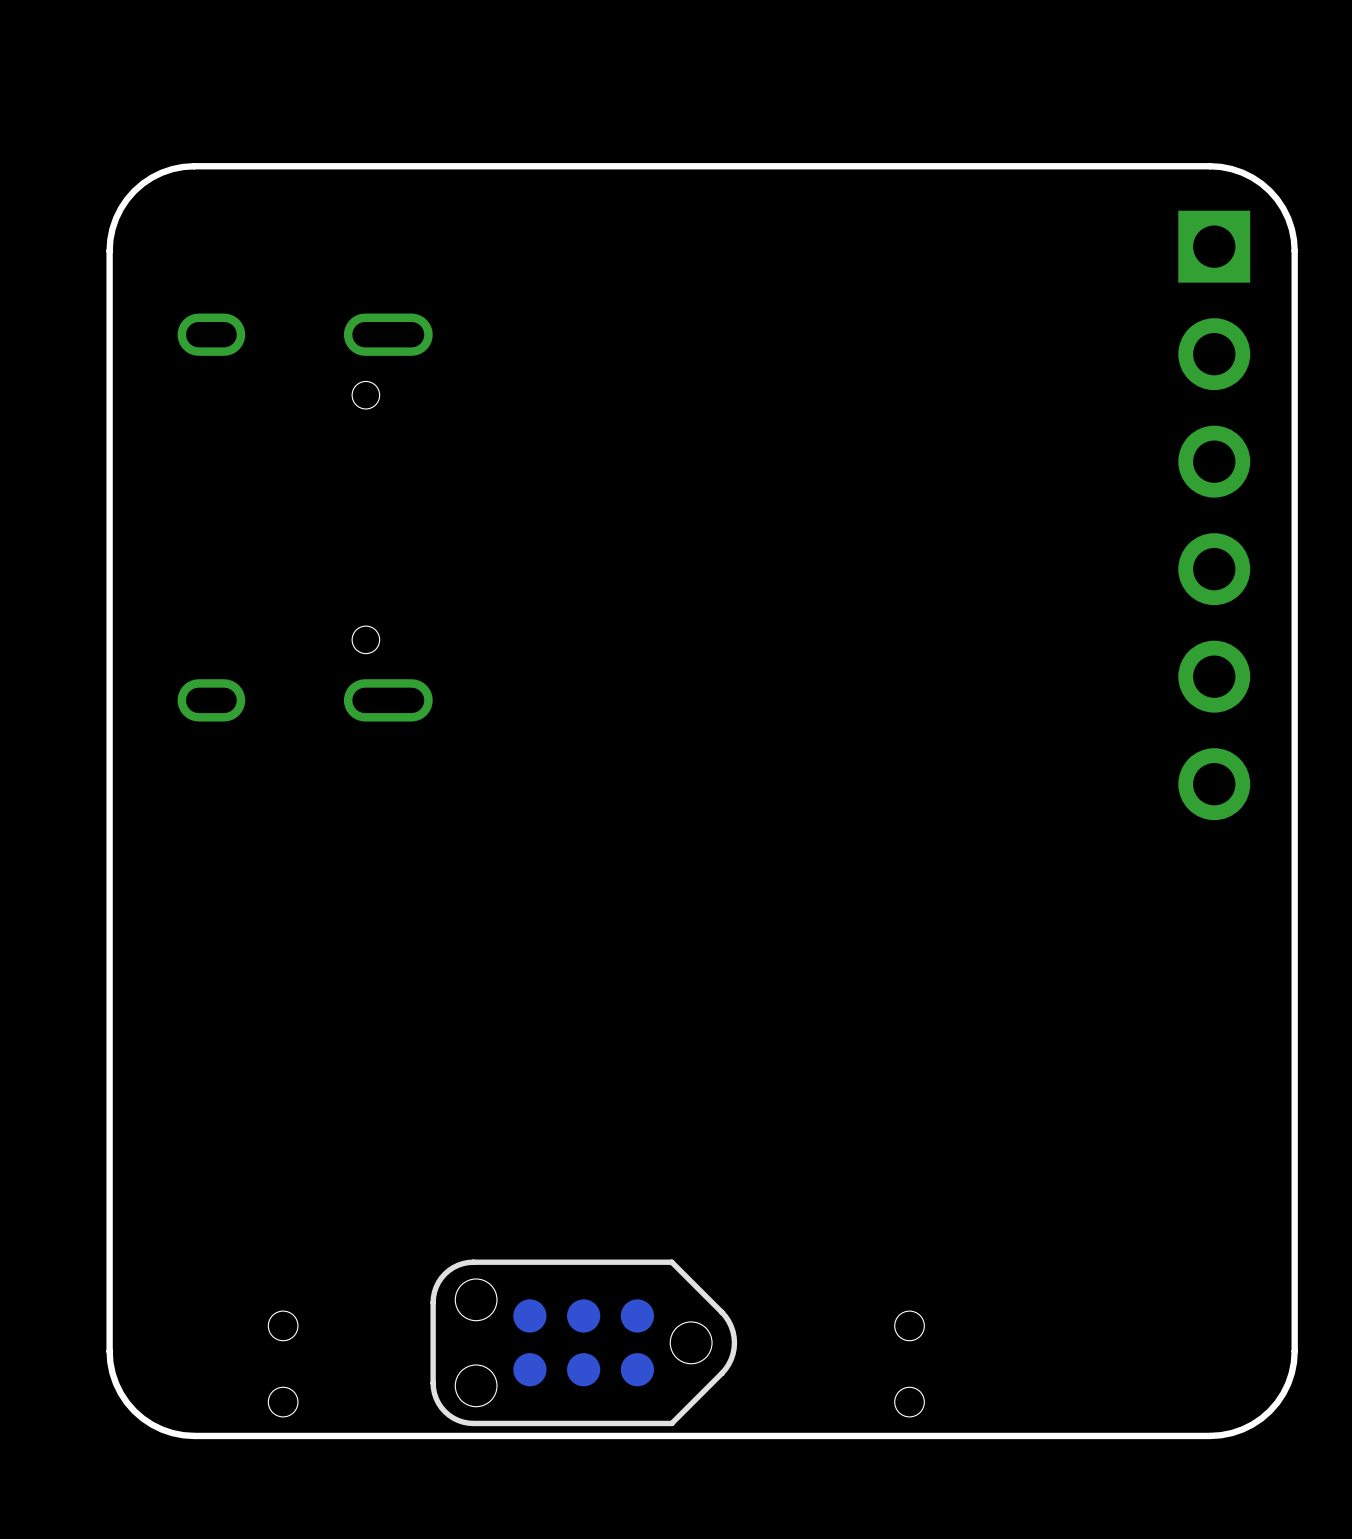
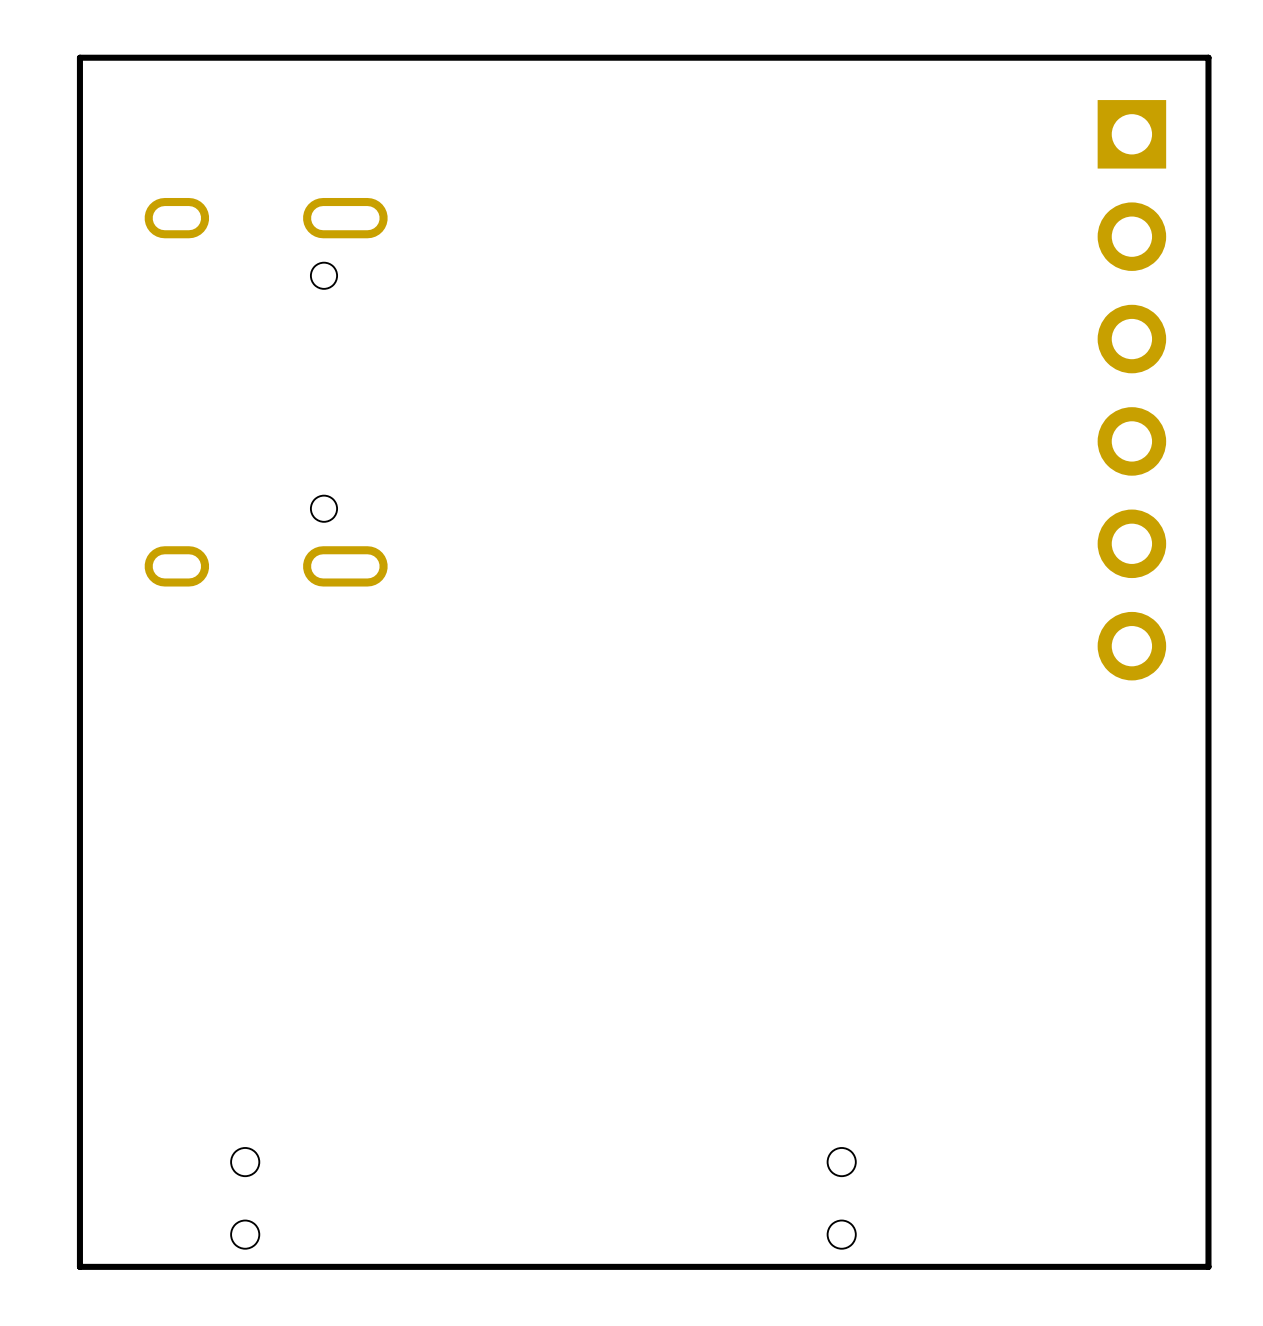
board edge: (194, 166) (161, 172) (134, 191) (116, 218) (109, 250) -> (160, 57) (79, 57) (79, 138)
board edge: (1210, 166) (1242, 172) (1269, 191) (1288, 218) (1294, 250) -> (1127, 57) (1208, 57) (1208, 138)
part: (583, 1342) -> none
board edge: (109, 1351) (116, 1383) (134, 1411) (161, 1429) (194, 1435) -> (79, 1186) (79, 1266) (160, 1266)
board edge: (1294, 1351) (1288, 1383) (1269, 1411) (1242, 1429) (1210, 1435) -> (1208, 1186) (1208, 1266) (1127, 1266)

